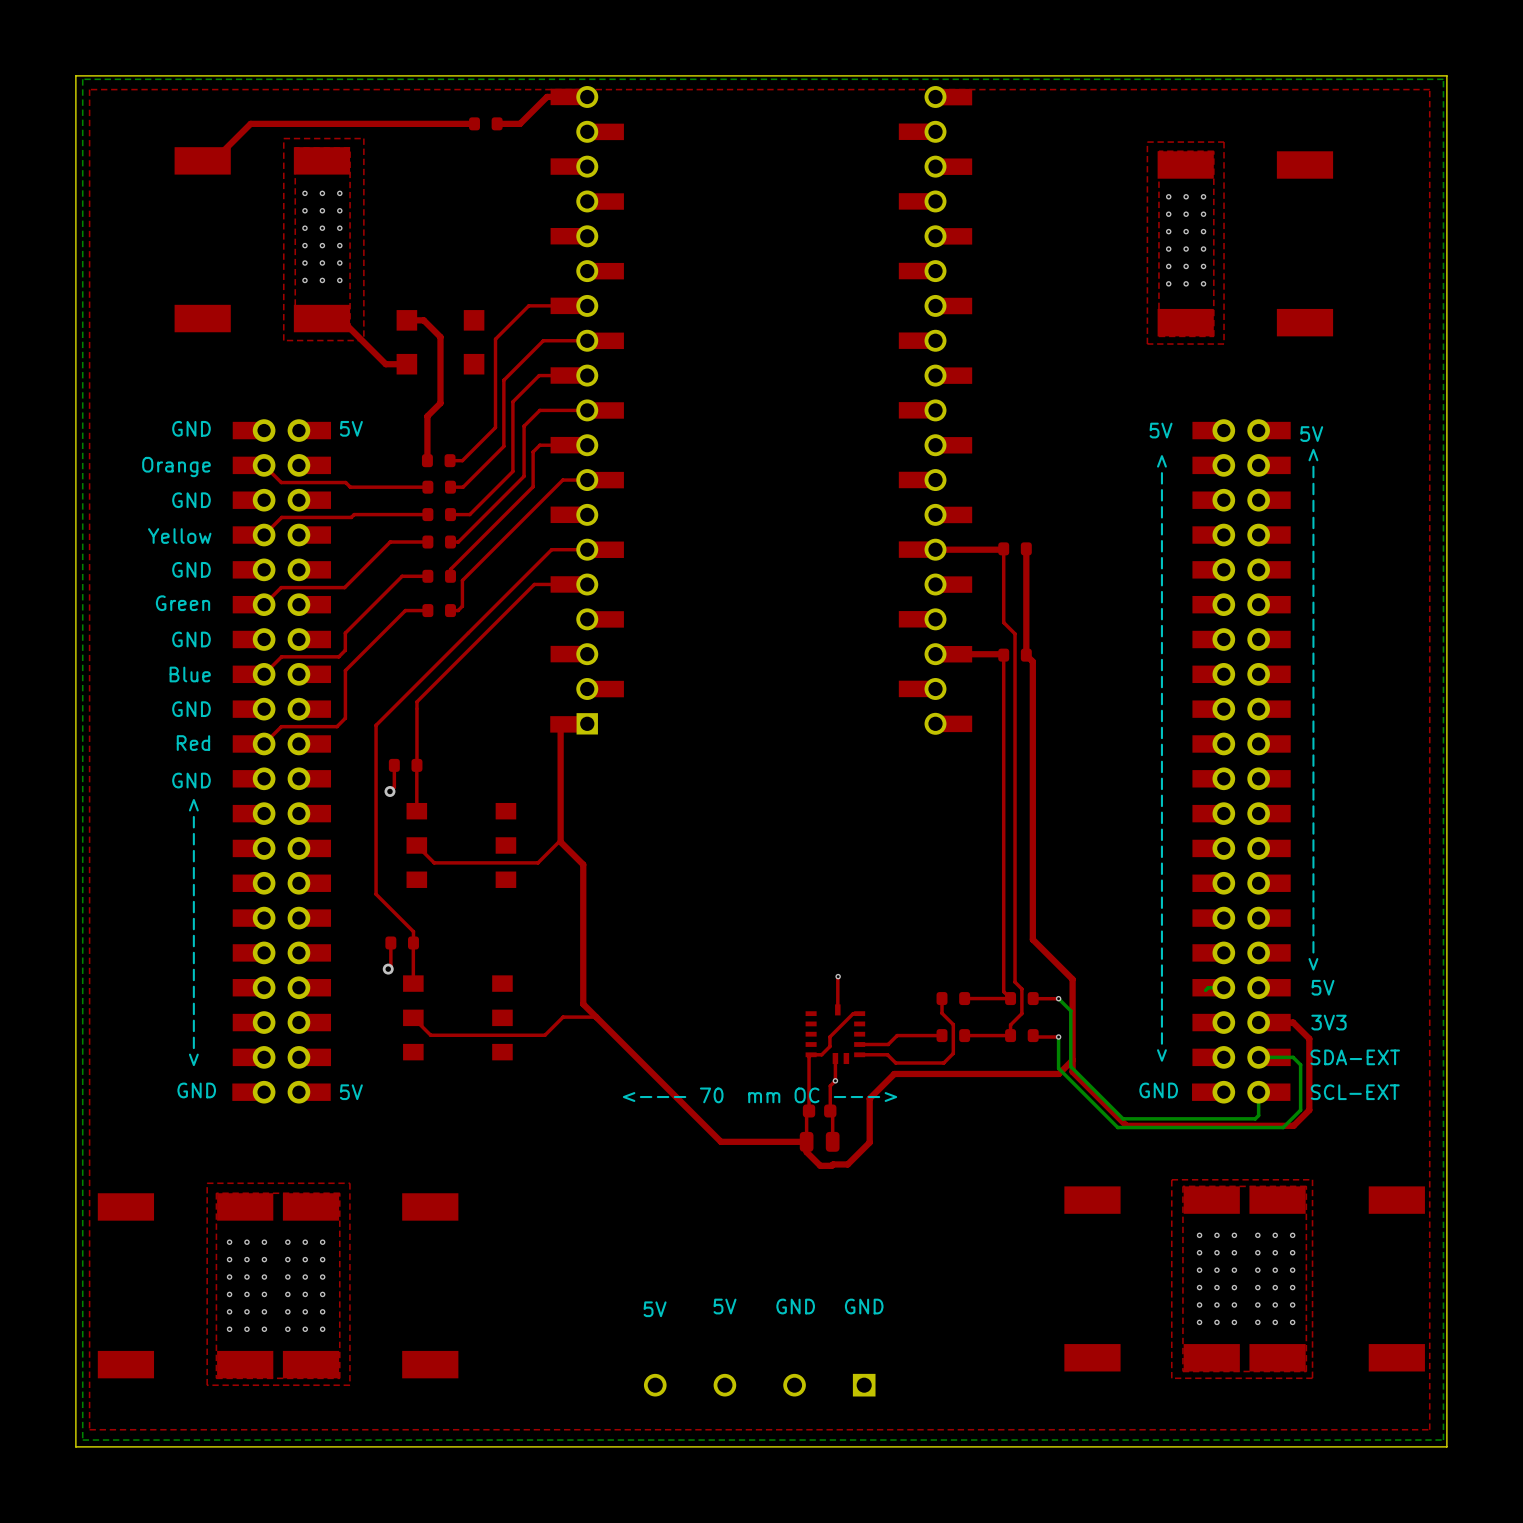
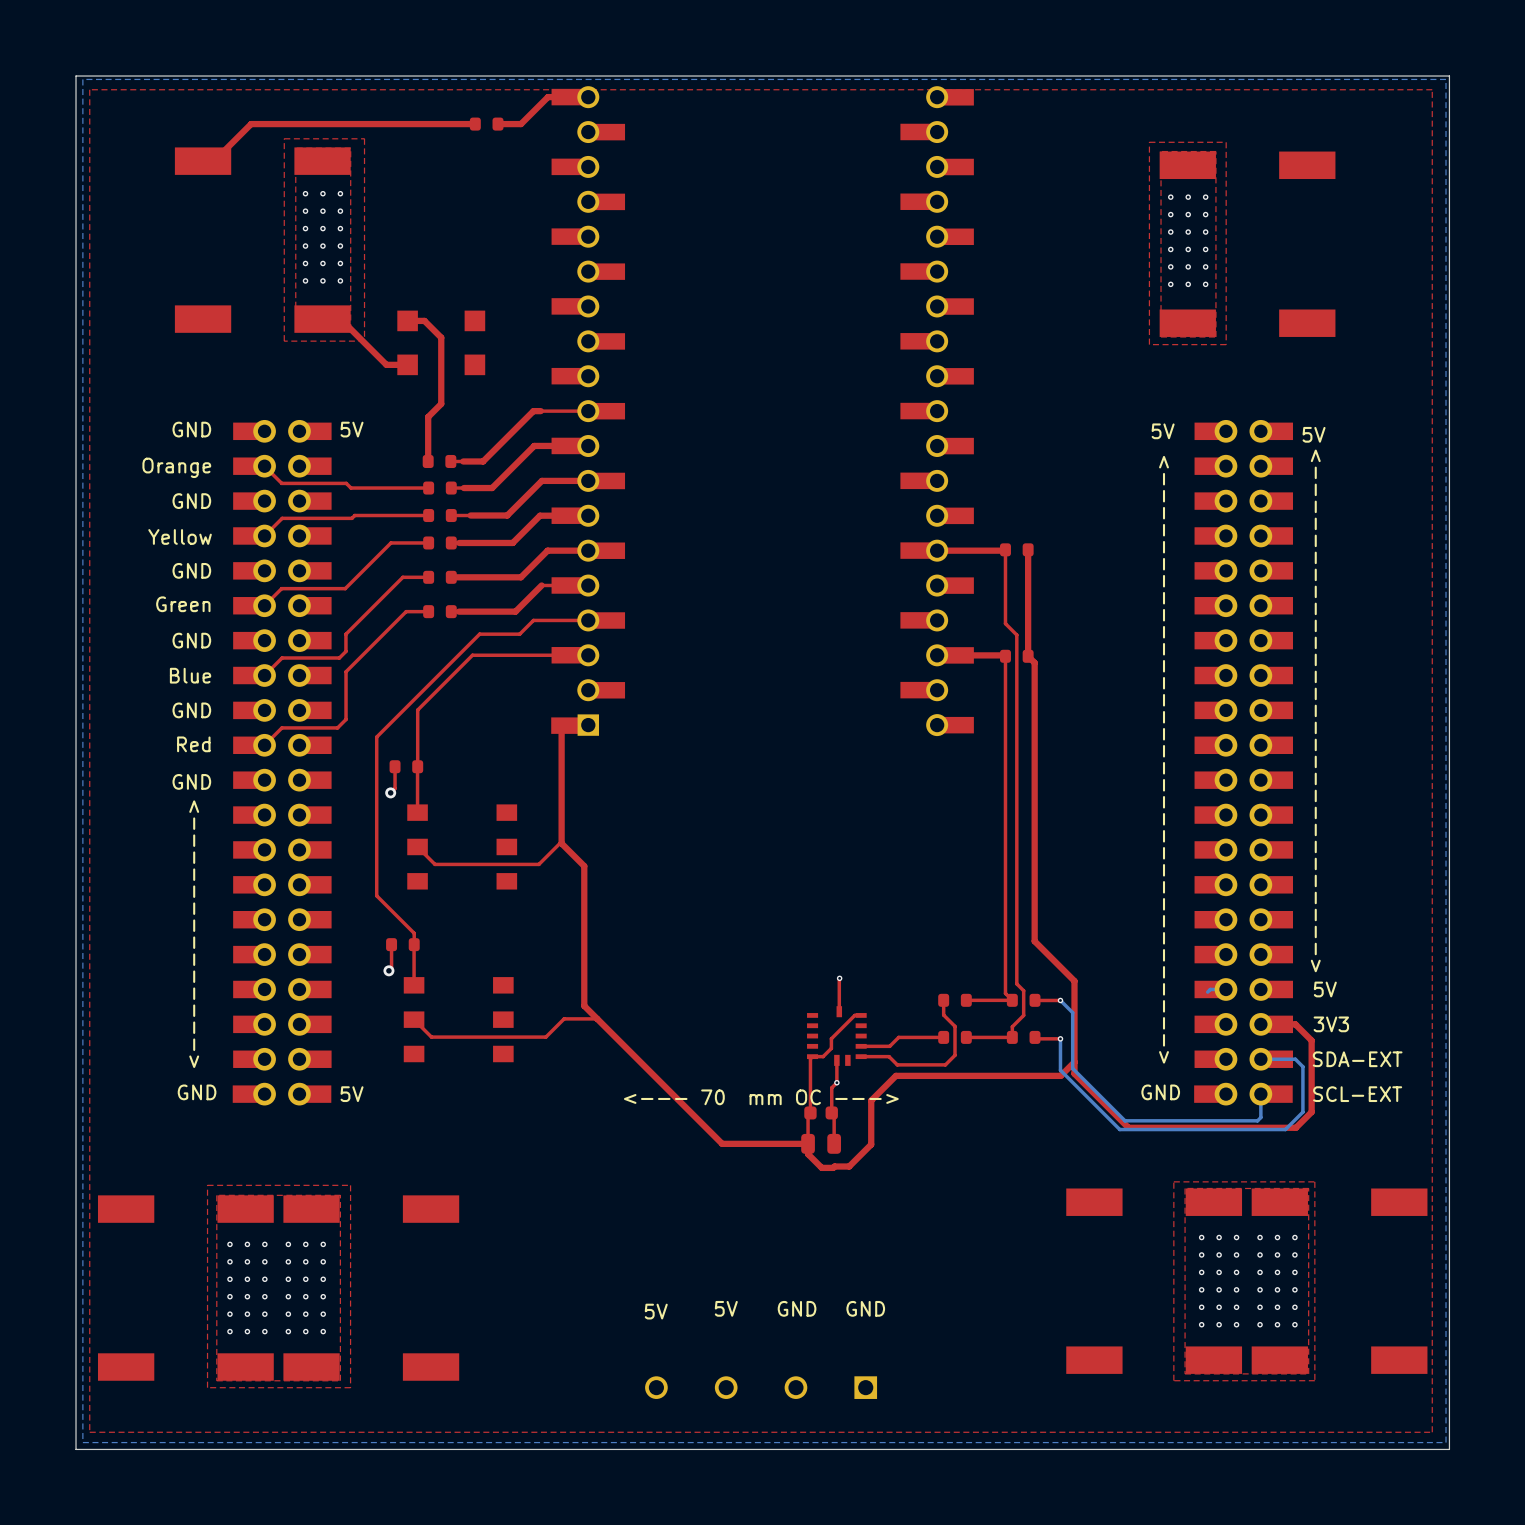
top track: (587, 305) (528, 305) (495, 339) (495, 427) (462, 460) -> none
top track: (609, 340) (543, 340) (503, 380) (503, 446) (463, 487) -> (566, 445) (534, 445) (492, 488) (463, 488)
top track: (587, 375) (539, 375) (512, 401) (512, 471) (469, 514) -> (588, 480) (541, 480) (507, 515) (470, 515)
top track: (539, 410) (524, 426) (524, 476) (458, 542) -> (540, 411) (533, 411) (483, 461) (463, 461)
top track: (587, 445) (539, 445) (533, 451) (533, 486) (450, 569) (450, 576) -> (588, 550) (547, 550) (521, 577) (451, 577)
top track: (609, 480) (562, 480) (462, 580) (462, 606) (458, 610) -> (541, 585) (515, 611) (458, 611)
top track: none -> (566, 515) (540, 515) (512, 542) (459, 542)
top track: (609, 549) (551, 549) (376, 725) (376, 735) -> (588, 620) (533, 620) (519, 634) (479, 634) (376, 737)
top track: (540, 584) (534, 584) (416, 701) (416, 708) -> (566, 655) (472, 655) (417, 710)

